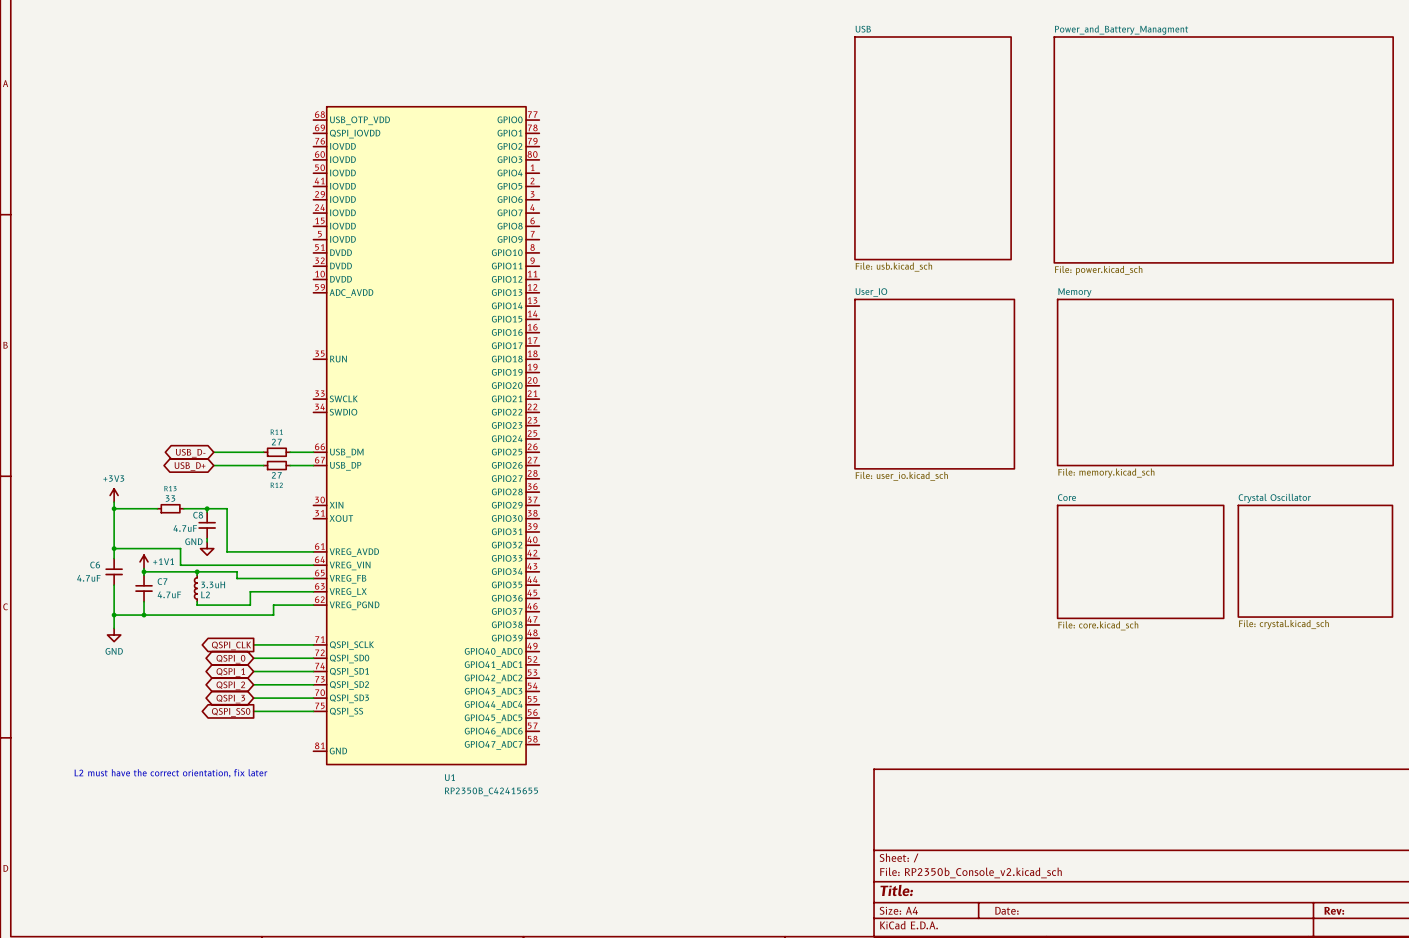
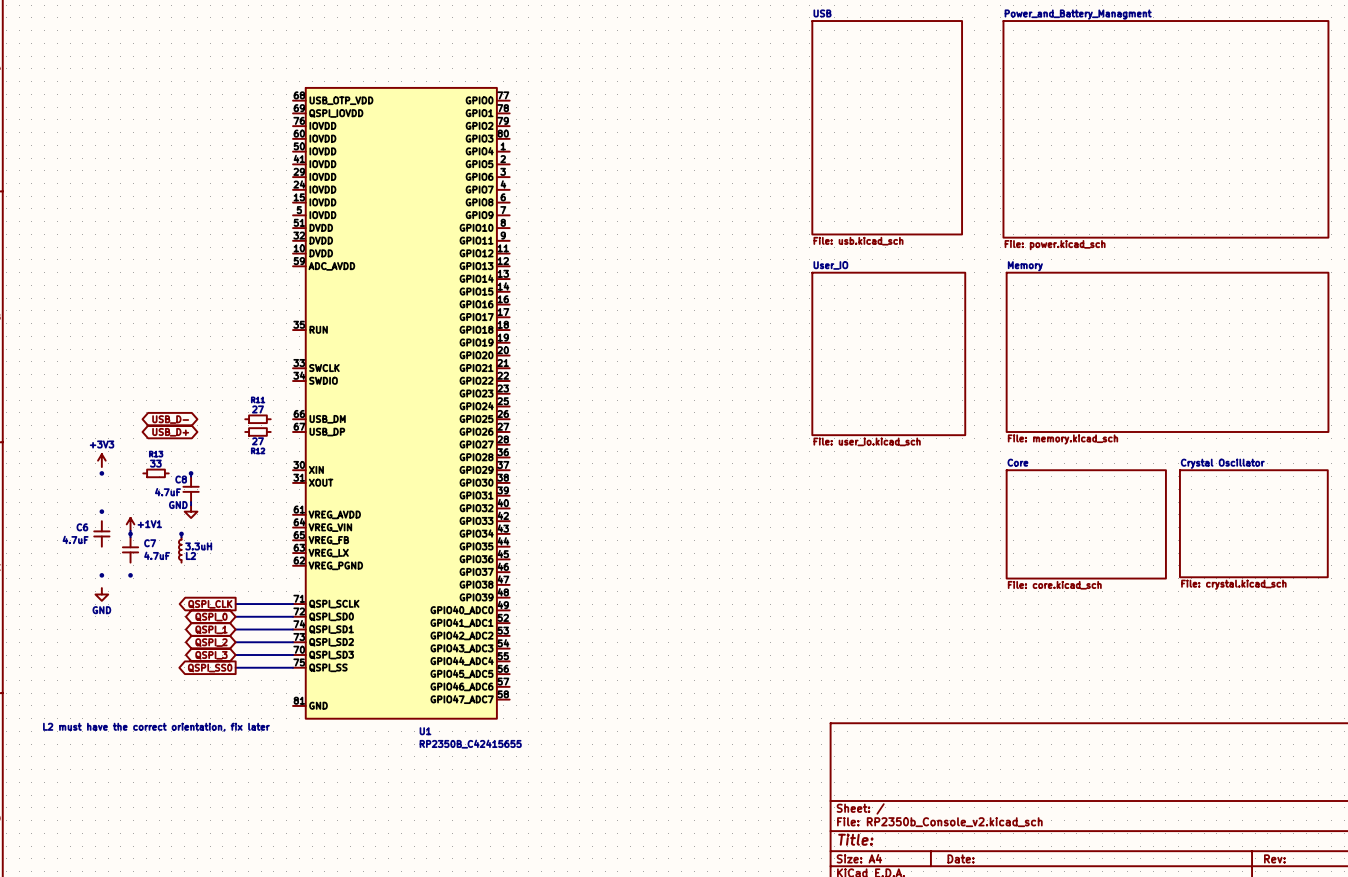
wire: (213, 452) (263, 452) -> none
wire: (290, 452) (313, 452) -> none
wire: (213, 465) (263, 465) -> none
wire: (290, 465) (313, 465) -> none
wire: (114, 502) (114, 558) -> none
wire: (114, 508) (157, 508) -> none
wire: (183, 508) (227, 508) (227, 551) (313, 551) -> none
wire: (114, 548) (180, 548) (180, 565) (313, 565) -> none
wire: (144, 571) (237, 571) (237, 578) (313, 578) -> none
wire: (114, 585) (114, 628) -> none
wire: (313, 591) (250, 591) (250, 605) (197, 605) (197, 601) -> none
wire: (144, 601) (144, 615) -> none
wire: (313, 605) (273, 605) (273, 615) (114, 615) -> none

